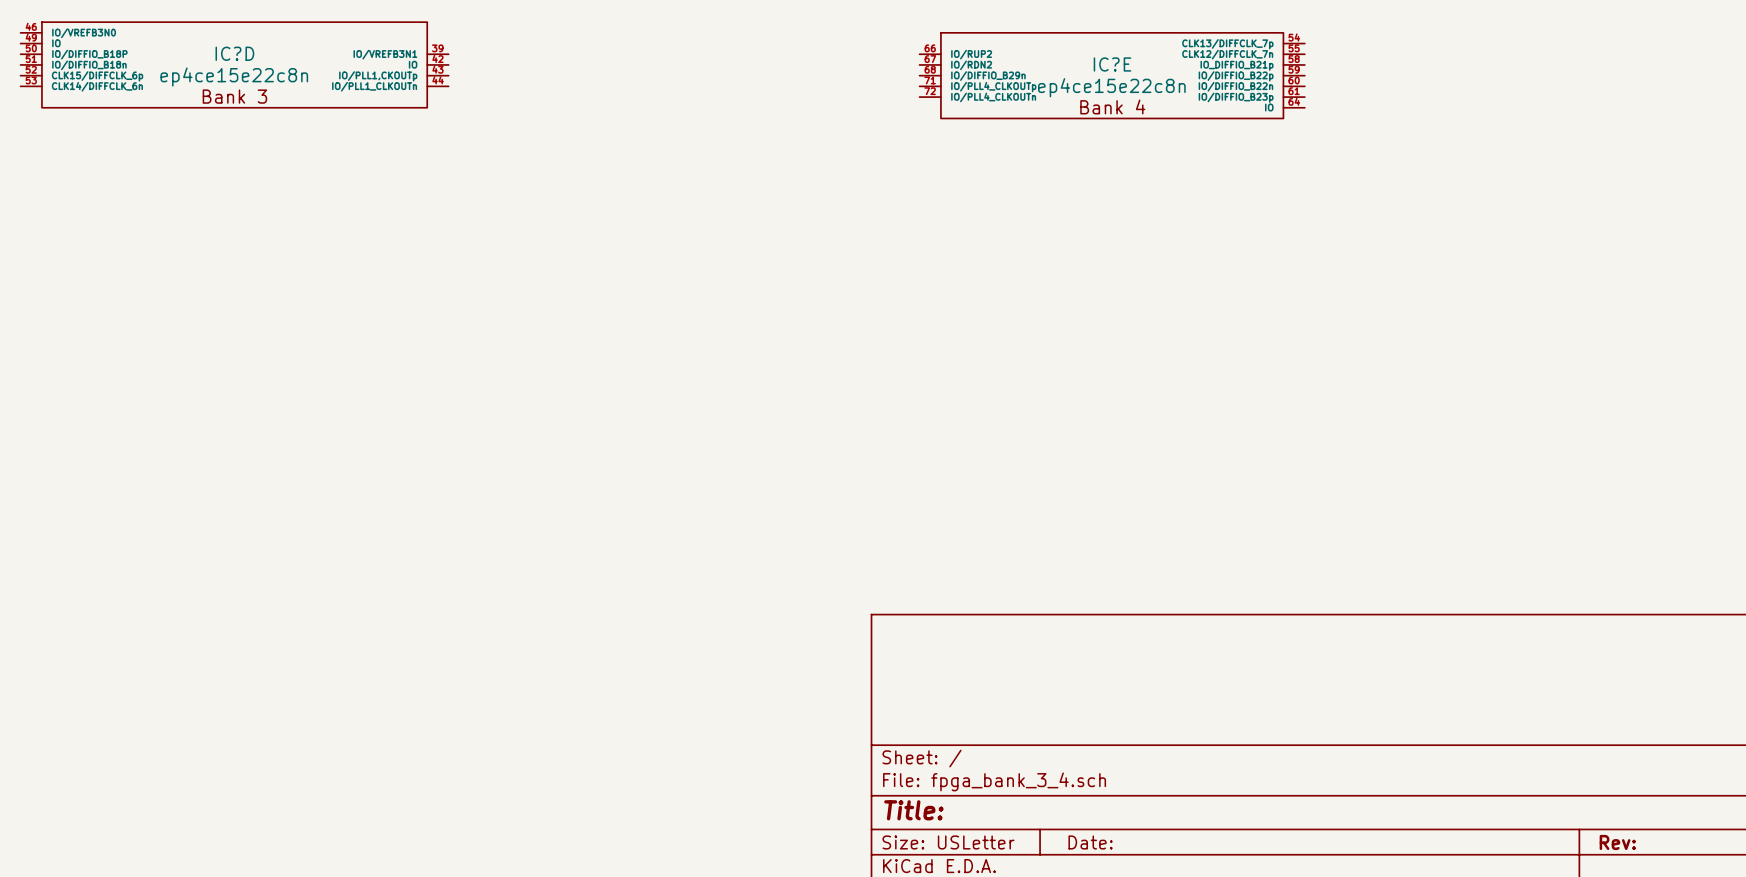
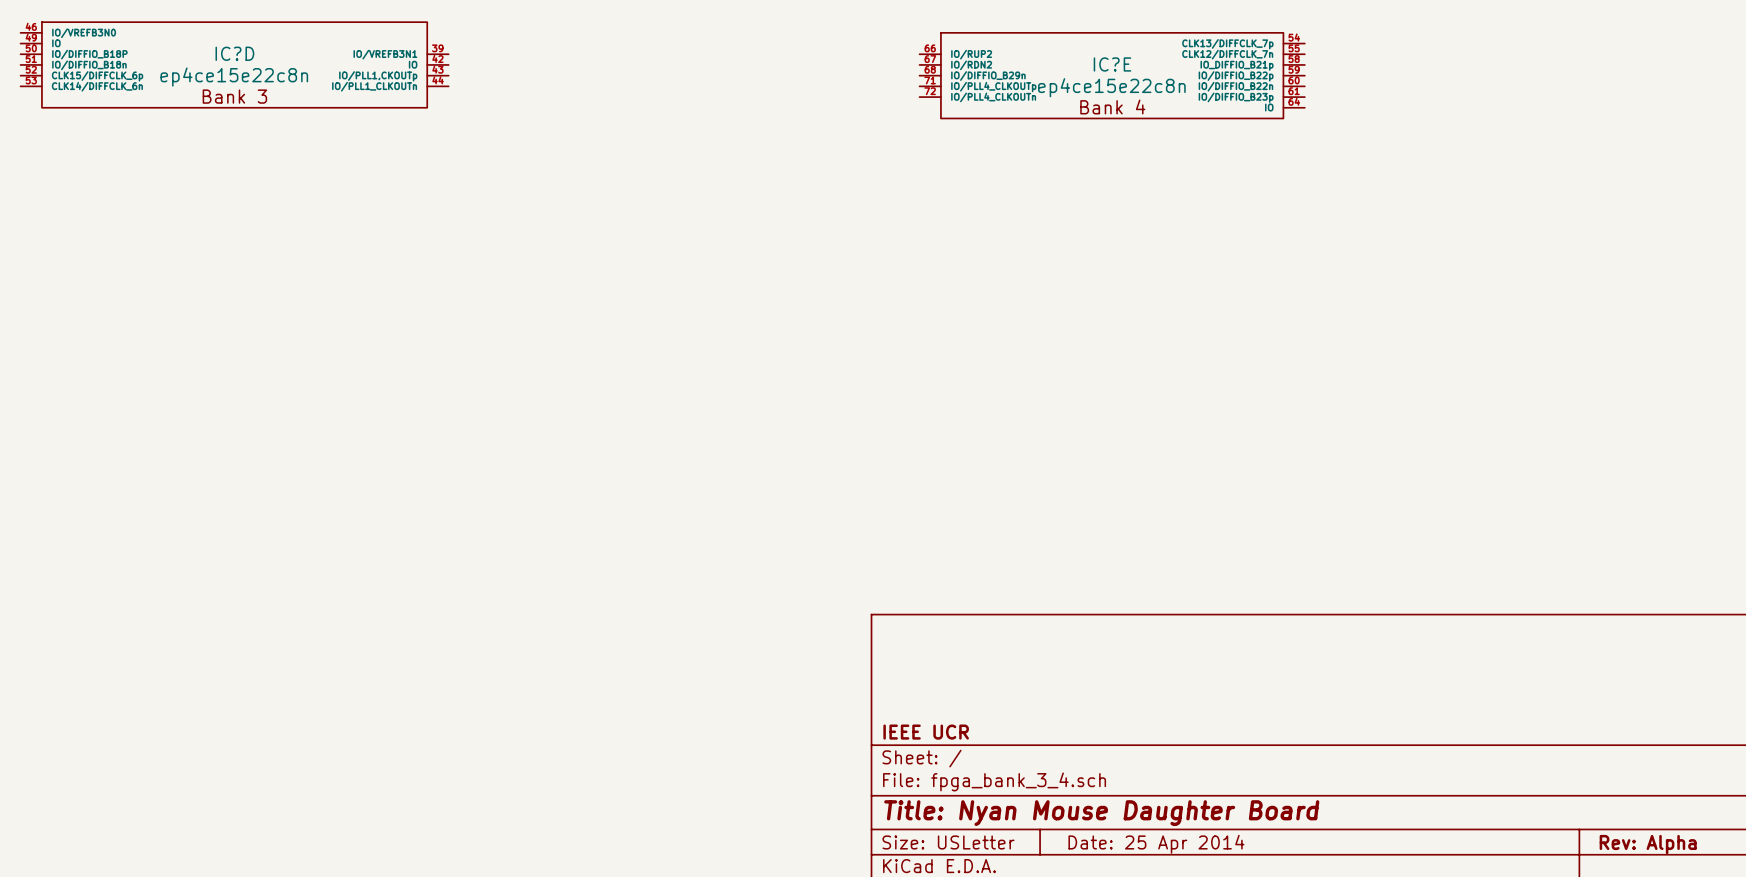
title block: none -> IEEE UCR (926, 732)
title block: Title: (913, 810) -> Title: Nyan Mouse Daughter Board (1101, 813)
title block: Date: (1090, 842) -> Date: 25 Apr 2014 (1156, 844)
title block: Rev: (1617, 842) -> Rev: Alpha (1648, 844)

